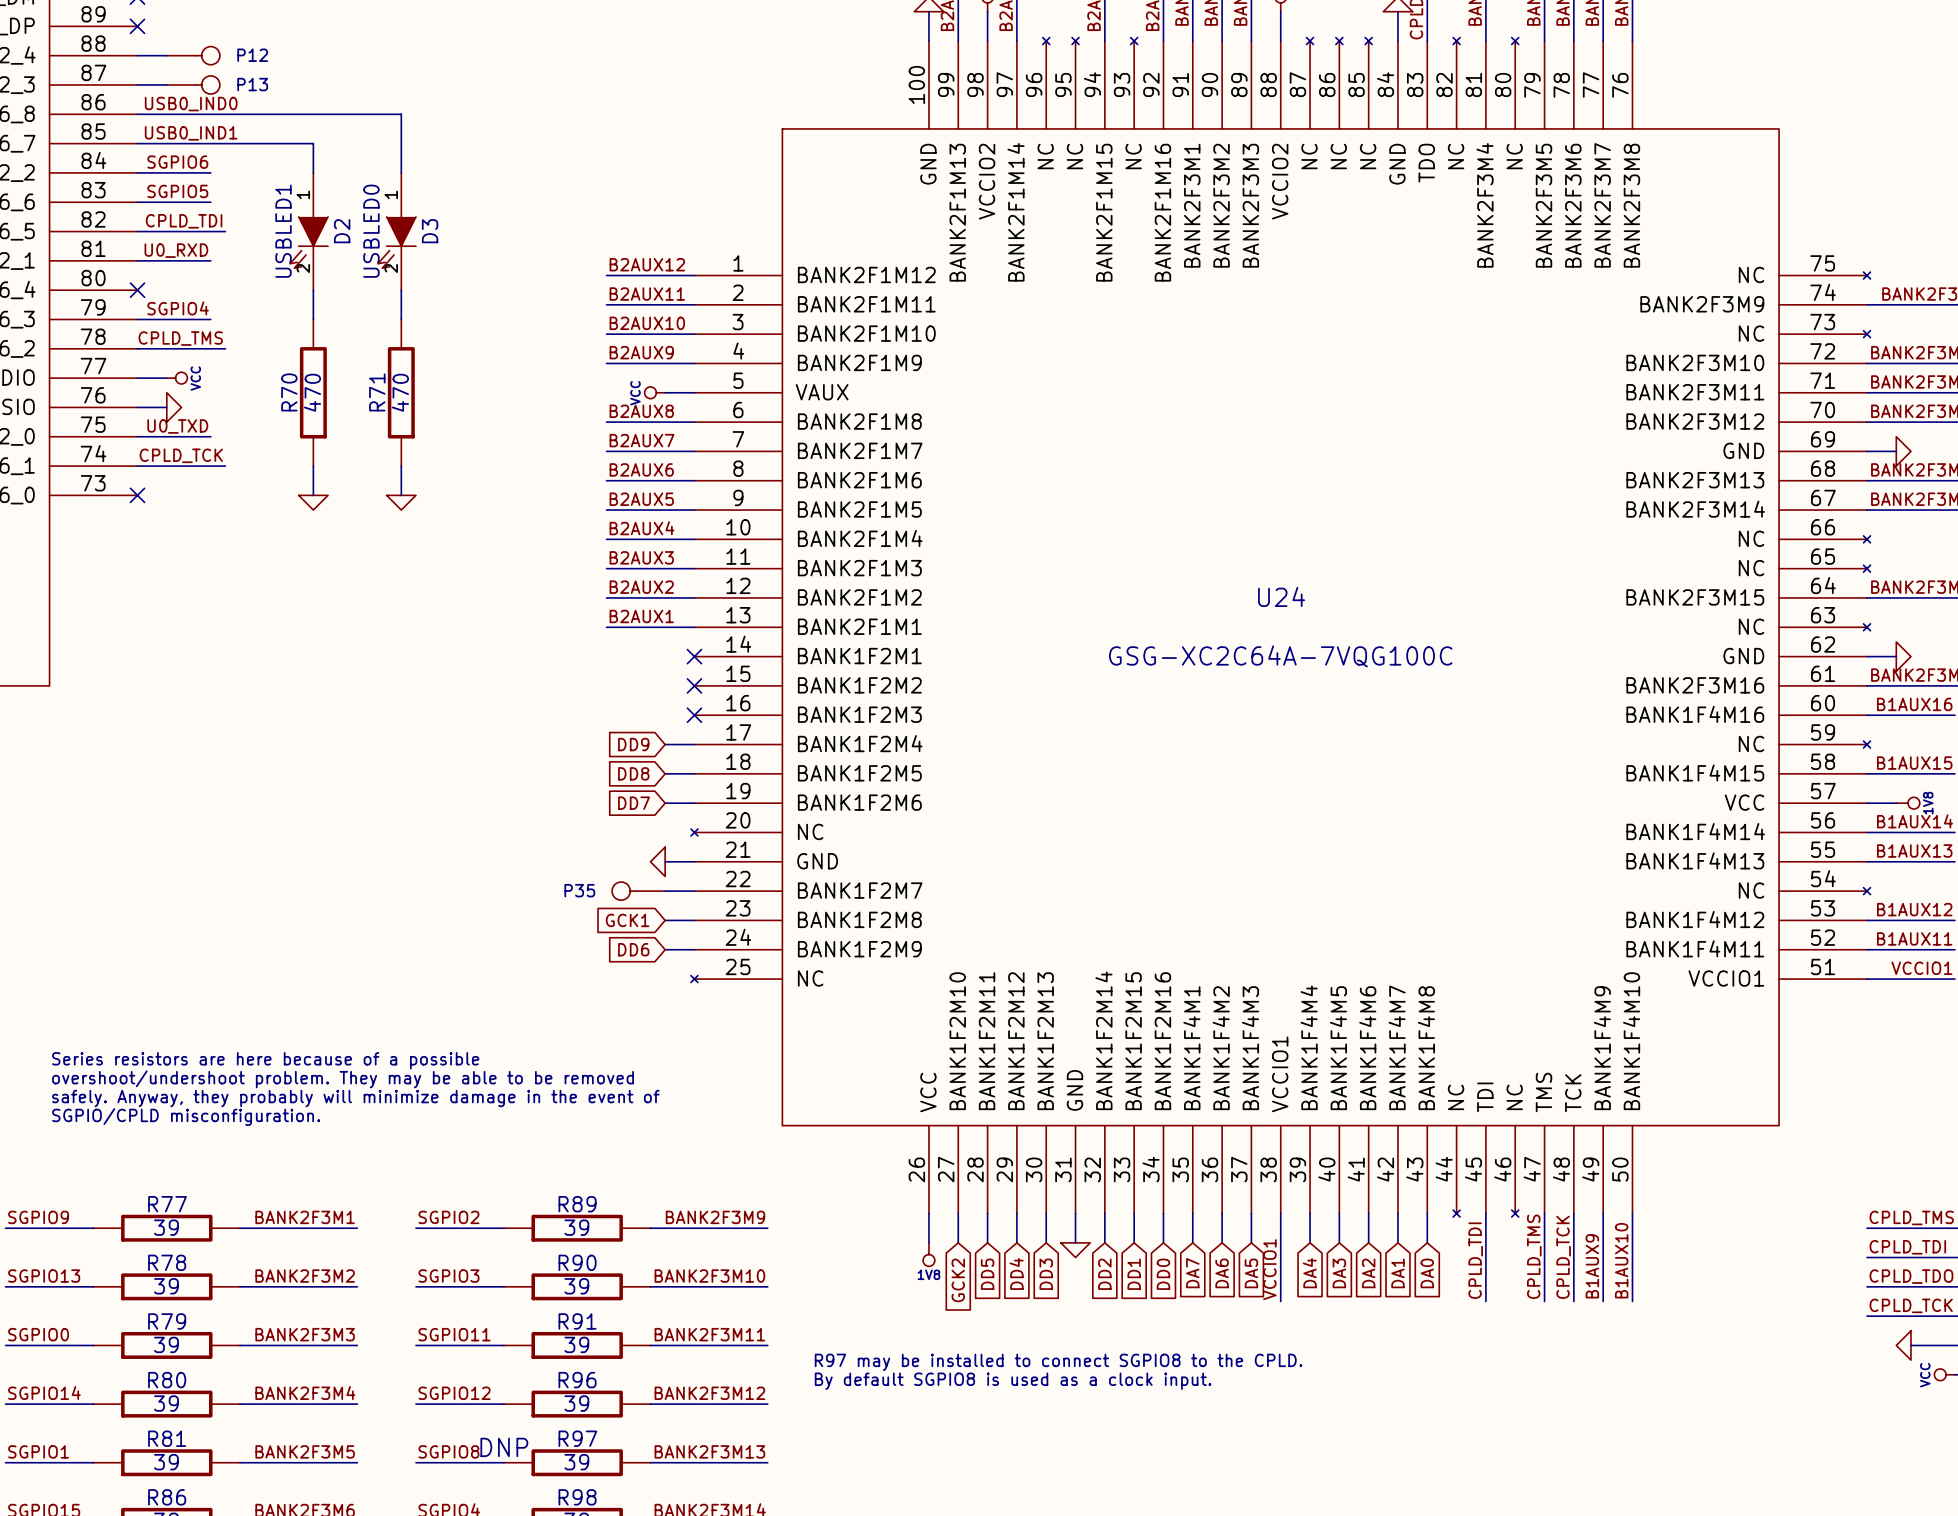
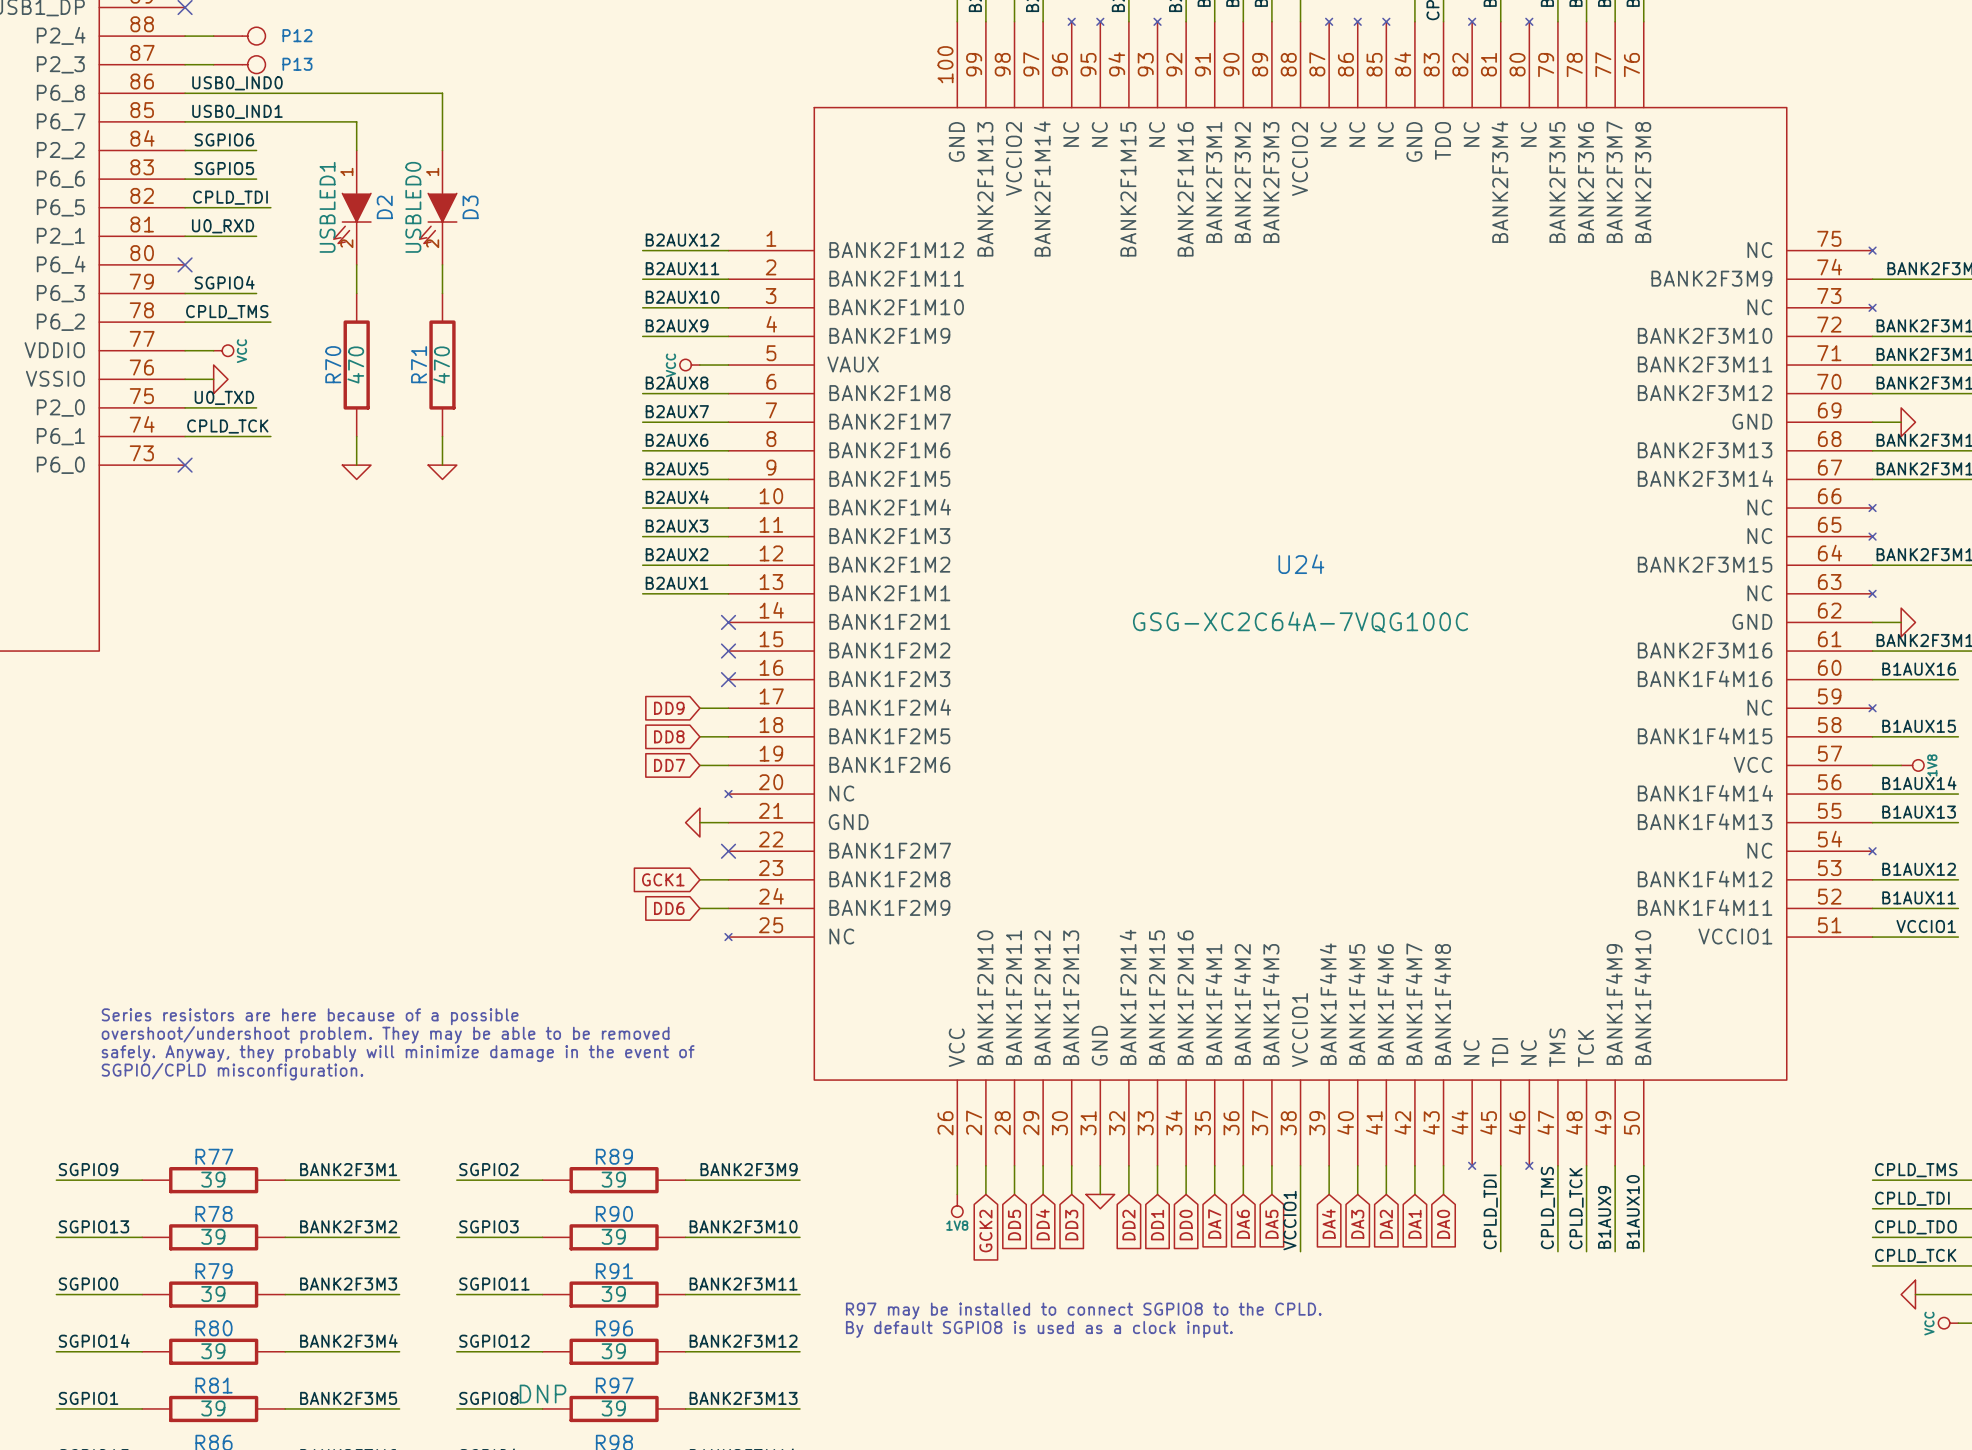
P35: (638, 891) -> none
wire: (665, 891) (694, 891) -> none
no-connect mark: none -> (728, 851)

